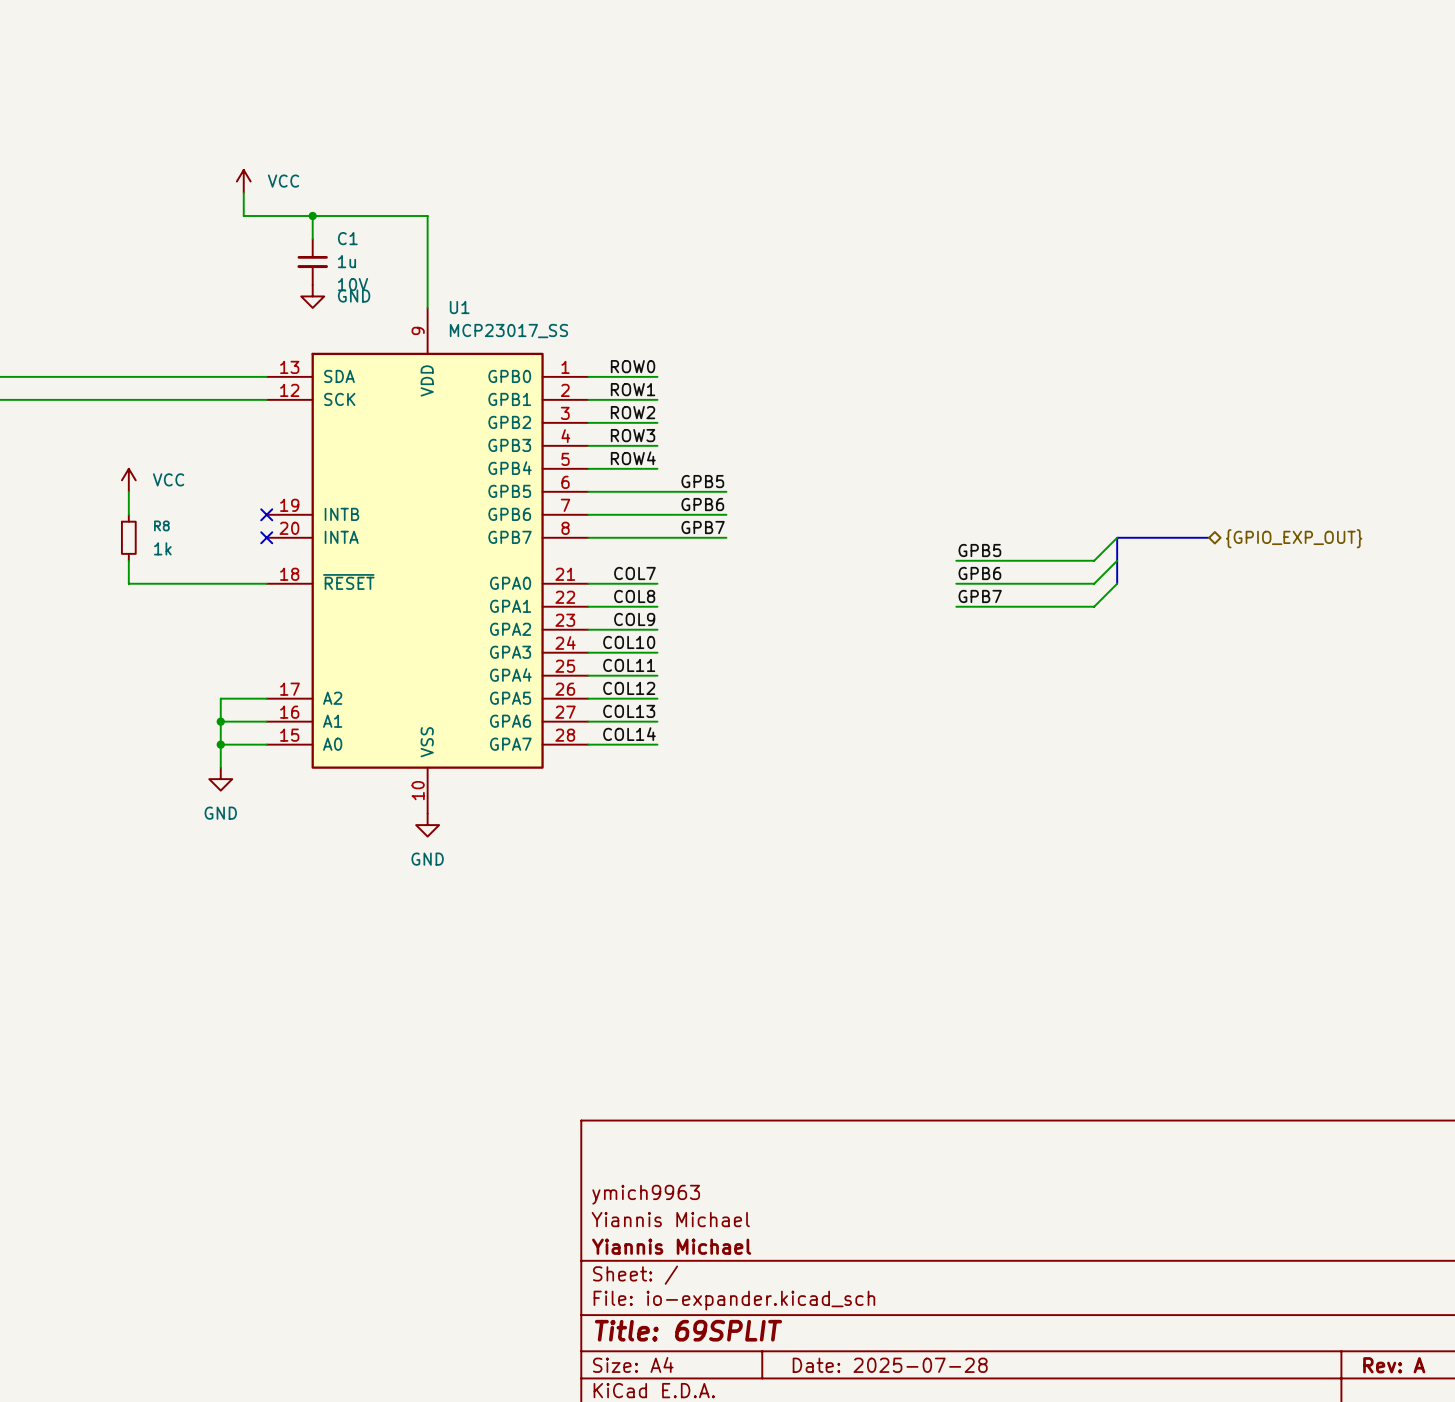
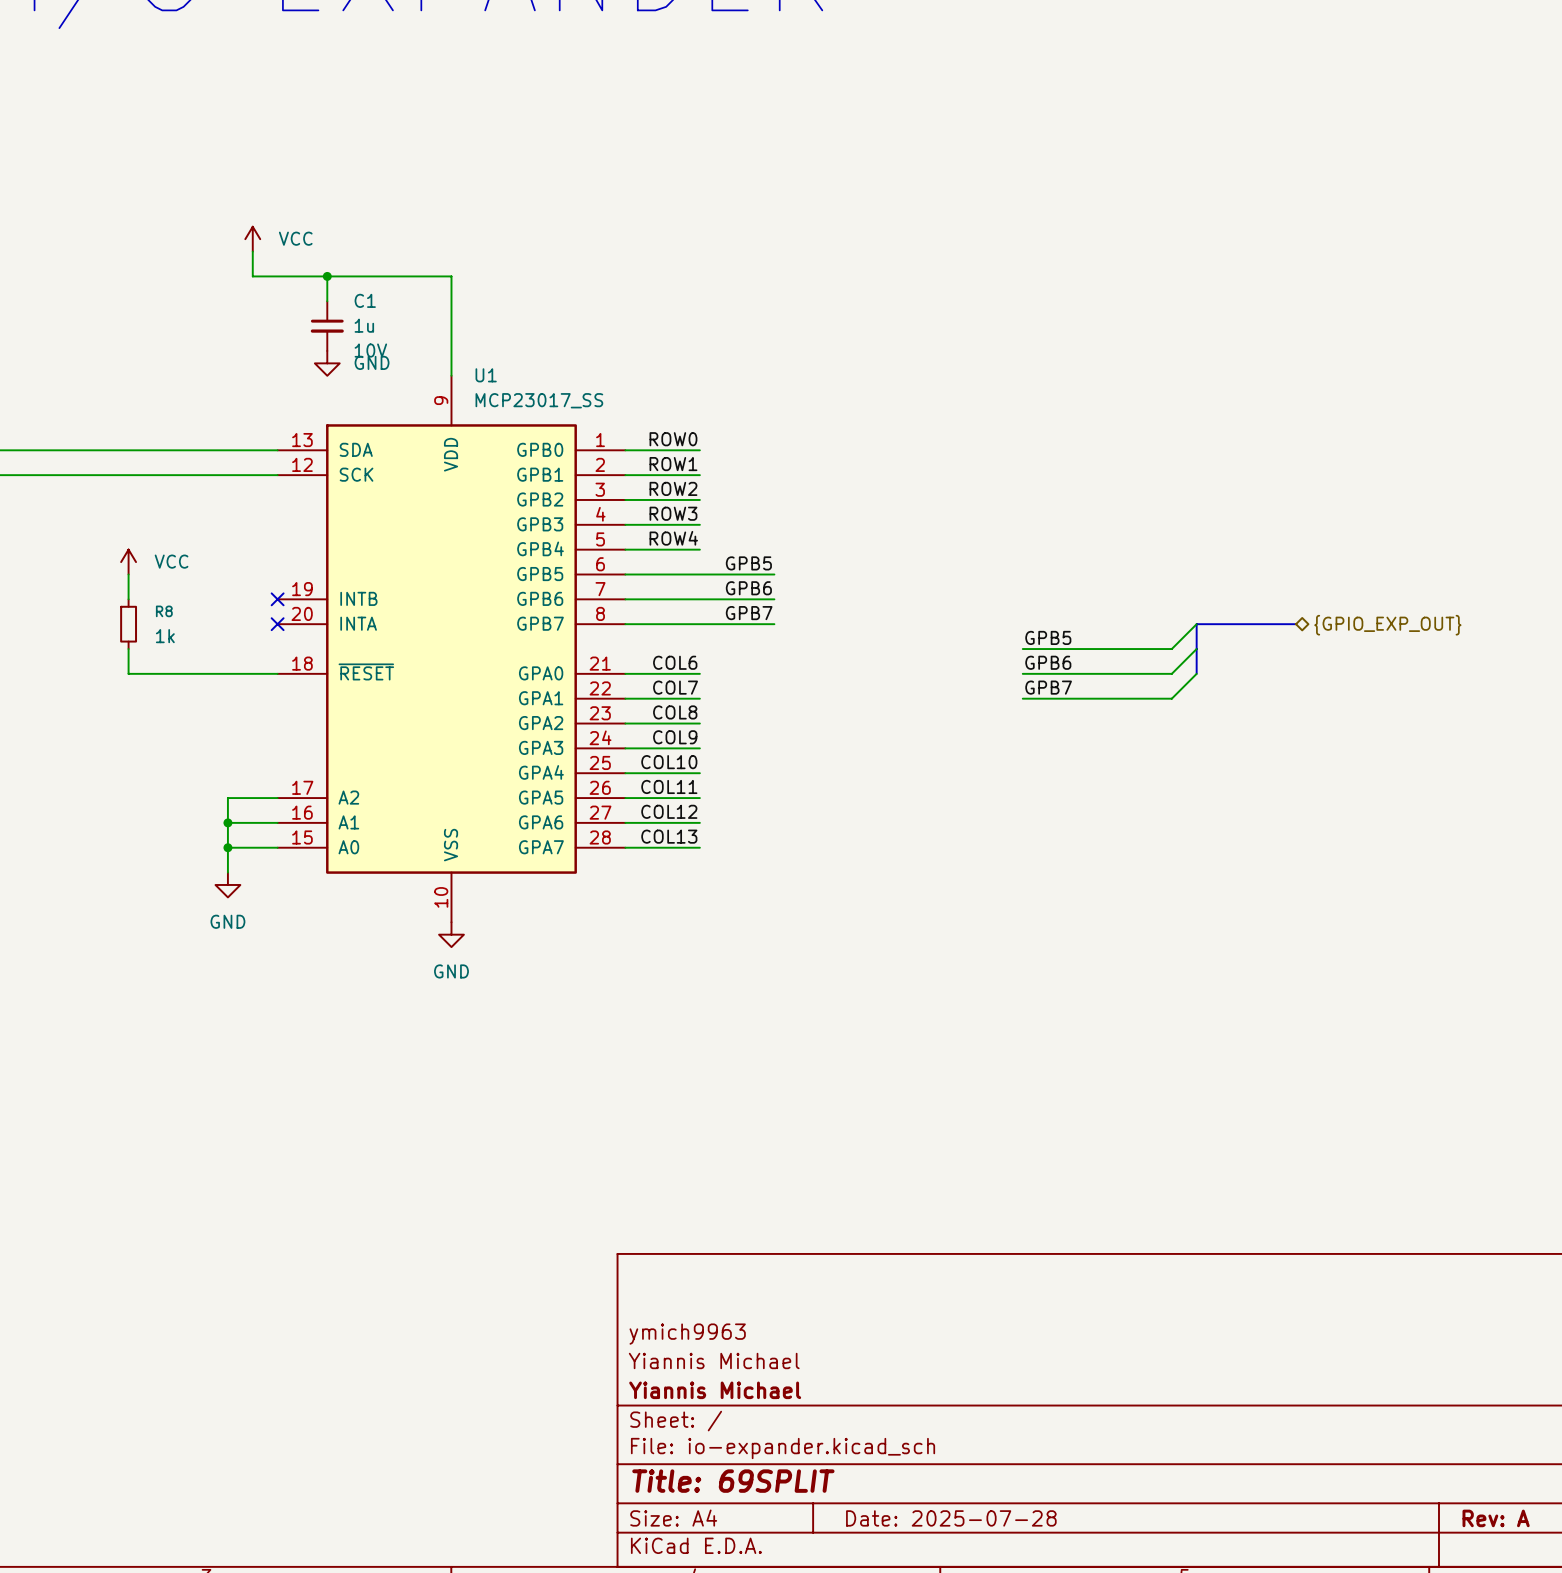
label: COL7 (634, 573) -> COL6 (675, 662)
label: COL8 (634, 596) -> COL7 (675, 687)
label: COL9 (634, 619) -> COL8 (675, 712)
label: COL10 (629, 642) -> COL9 (675, 737)
label: COL11 (629, 665) -> COL10 (669, 762)
label: COL12 (629, 688) -> COL11 (669, 786)
label: COL13 (629, 711) -> COL12 (669, 811)
label: COL14 (629, 734) -> COL13 (669, 836)

